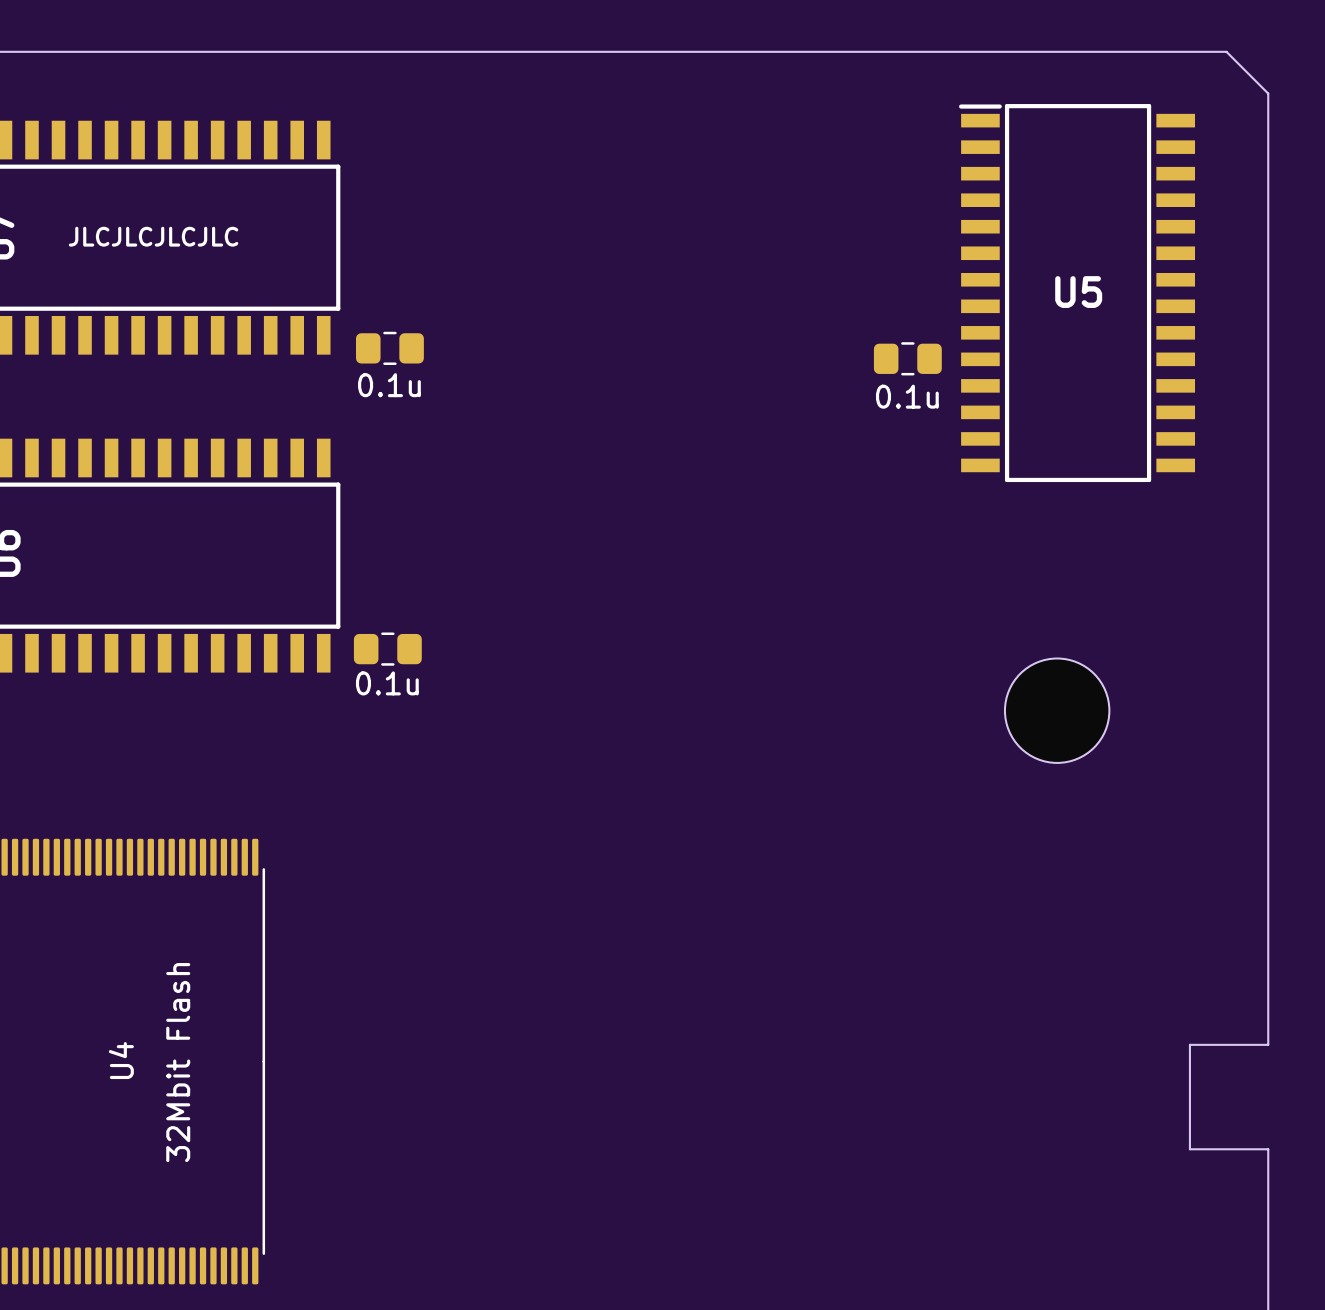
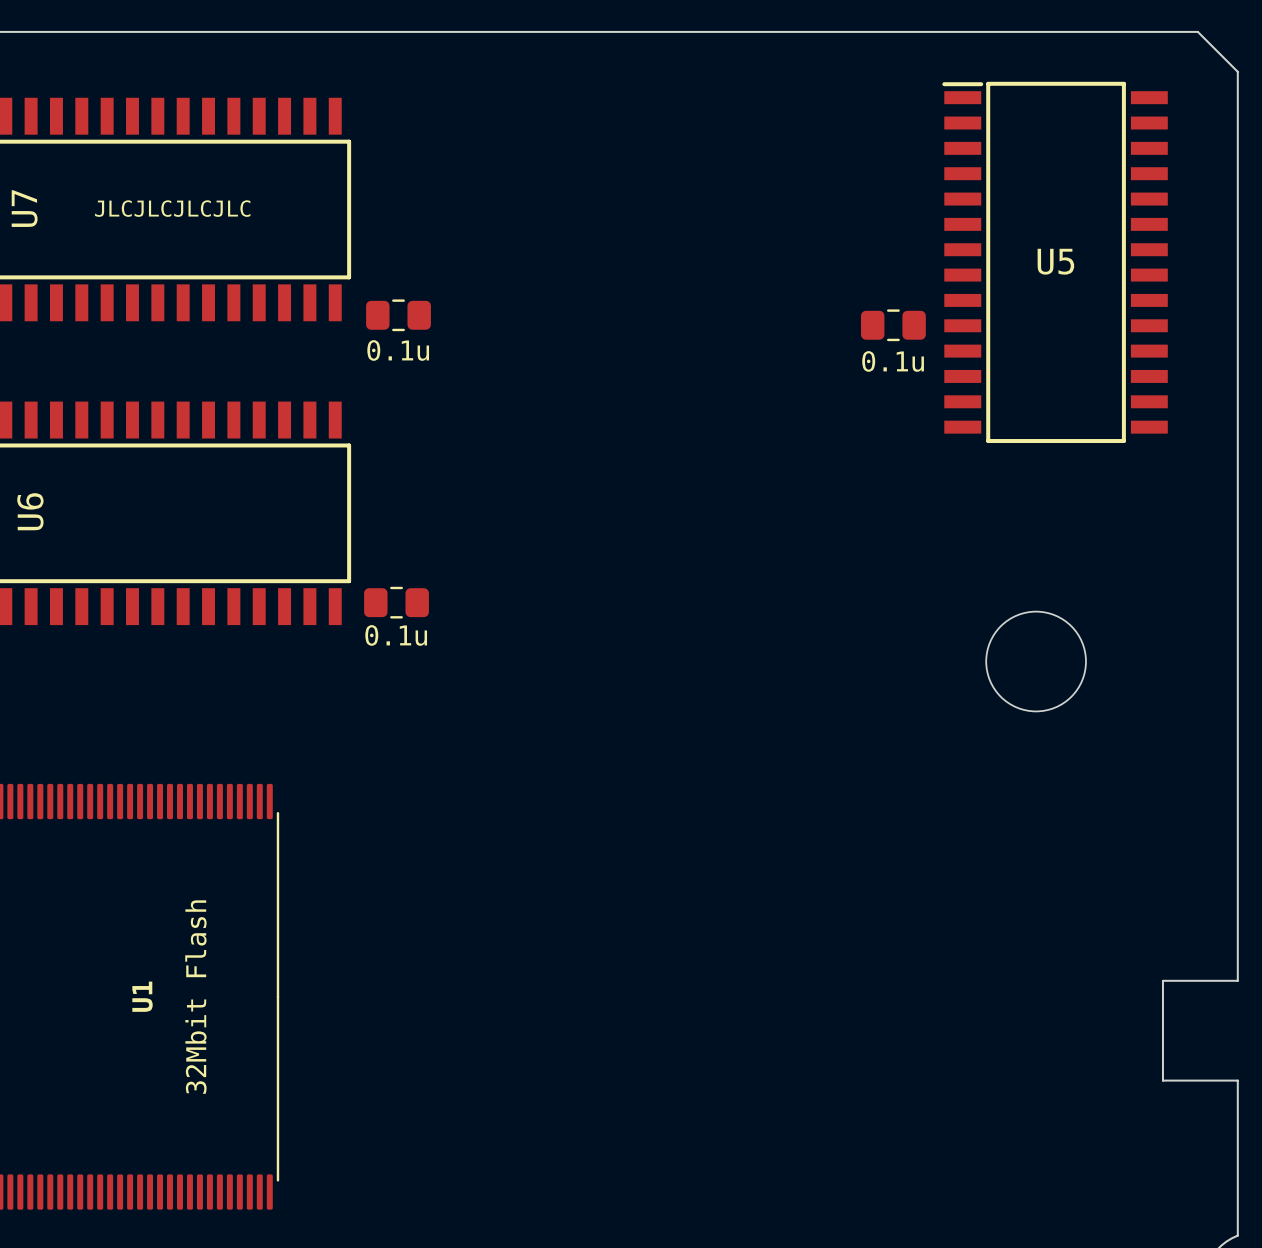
U4 name: U4 (121, 1060) -> U1 (142, 996)

